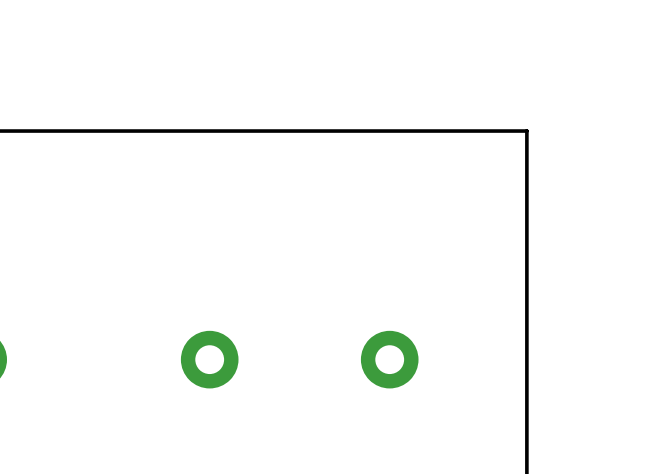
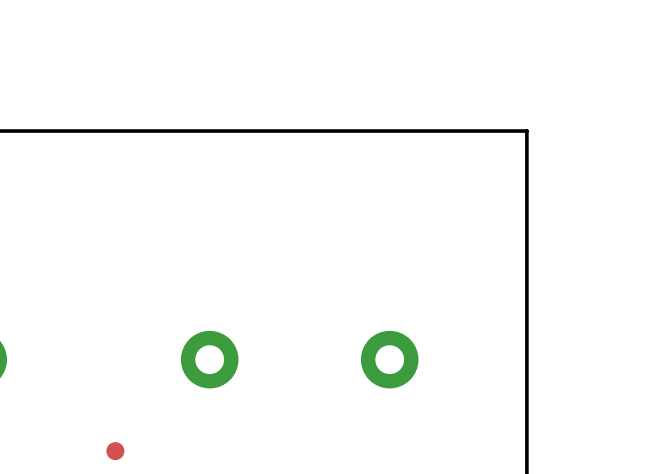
part: none -> (115, 451)

